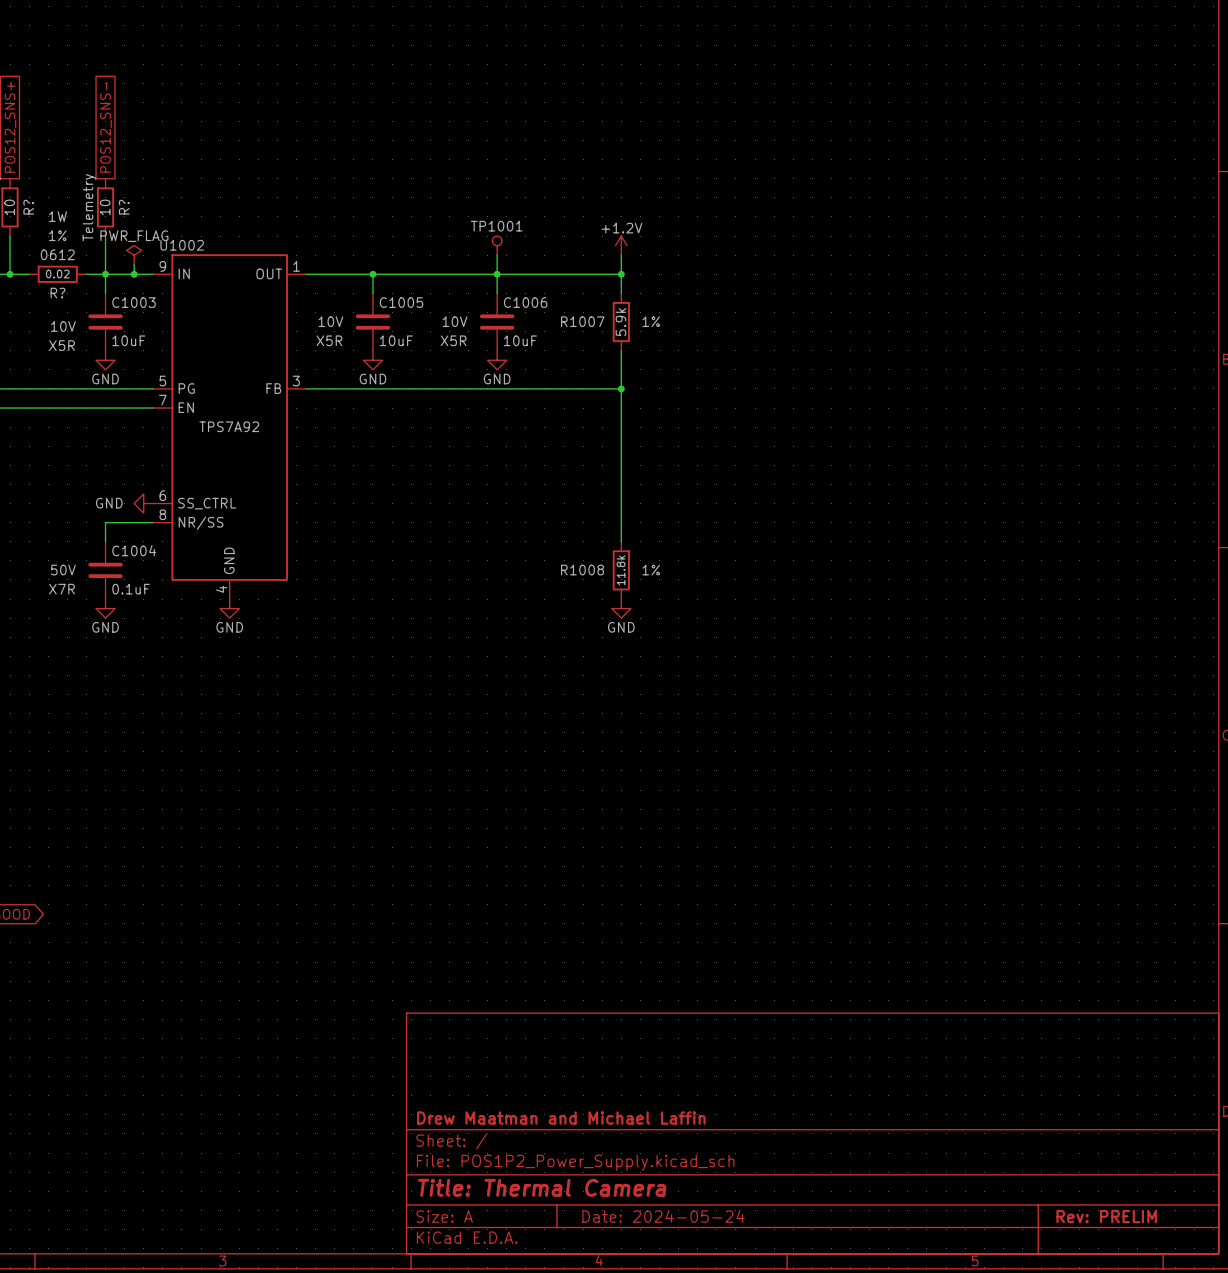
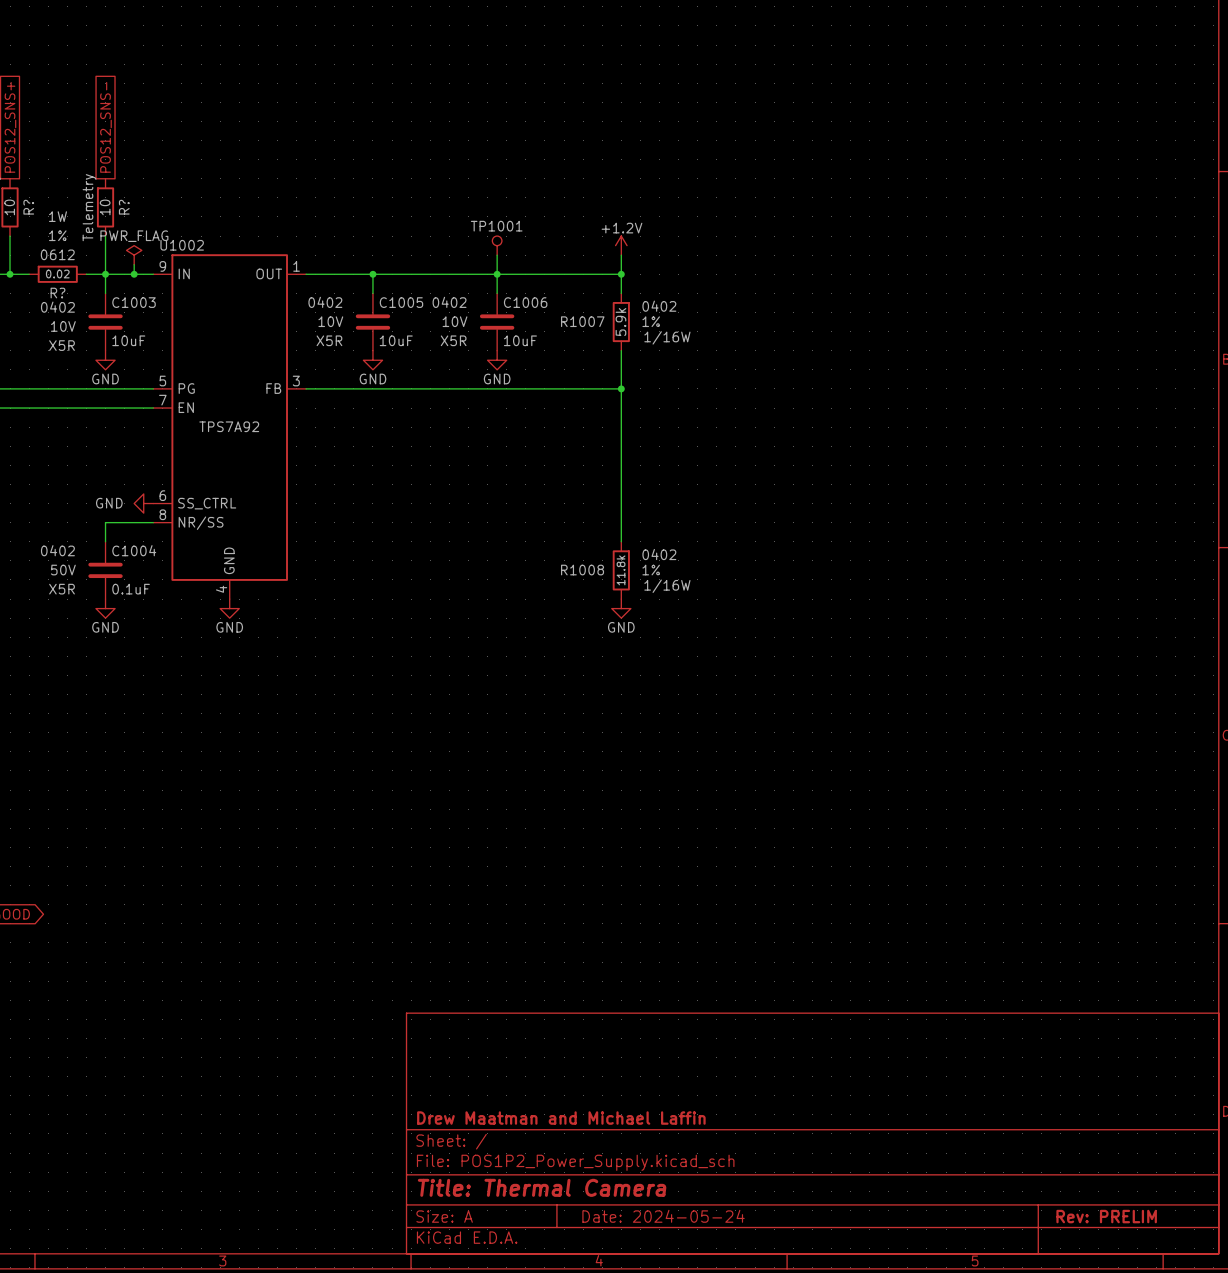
C1005 text: none -> 0402 (325, 302)
C1006 text: none -> 0402 (449, 302)
R1007 text: none -> 0402 (659, 306)
C1003 text: none -> 0402 (57, 307)
R1007 text: none -> 1/16W (667, 337)
C1004 text: none -> 0402 (57, 550)
R1008 text: none -> 0402 (659, 554)
R1008 text: none -> 1/16W (667, 586)
C1004 text: X7R (62, 589) -> X5R (62, 589)

